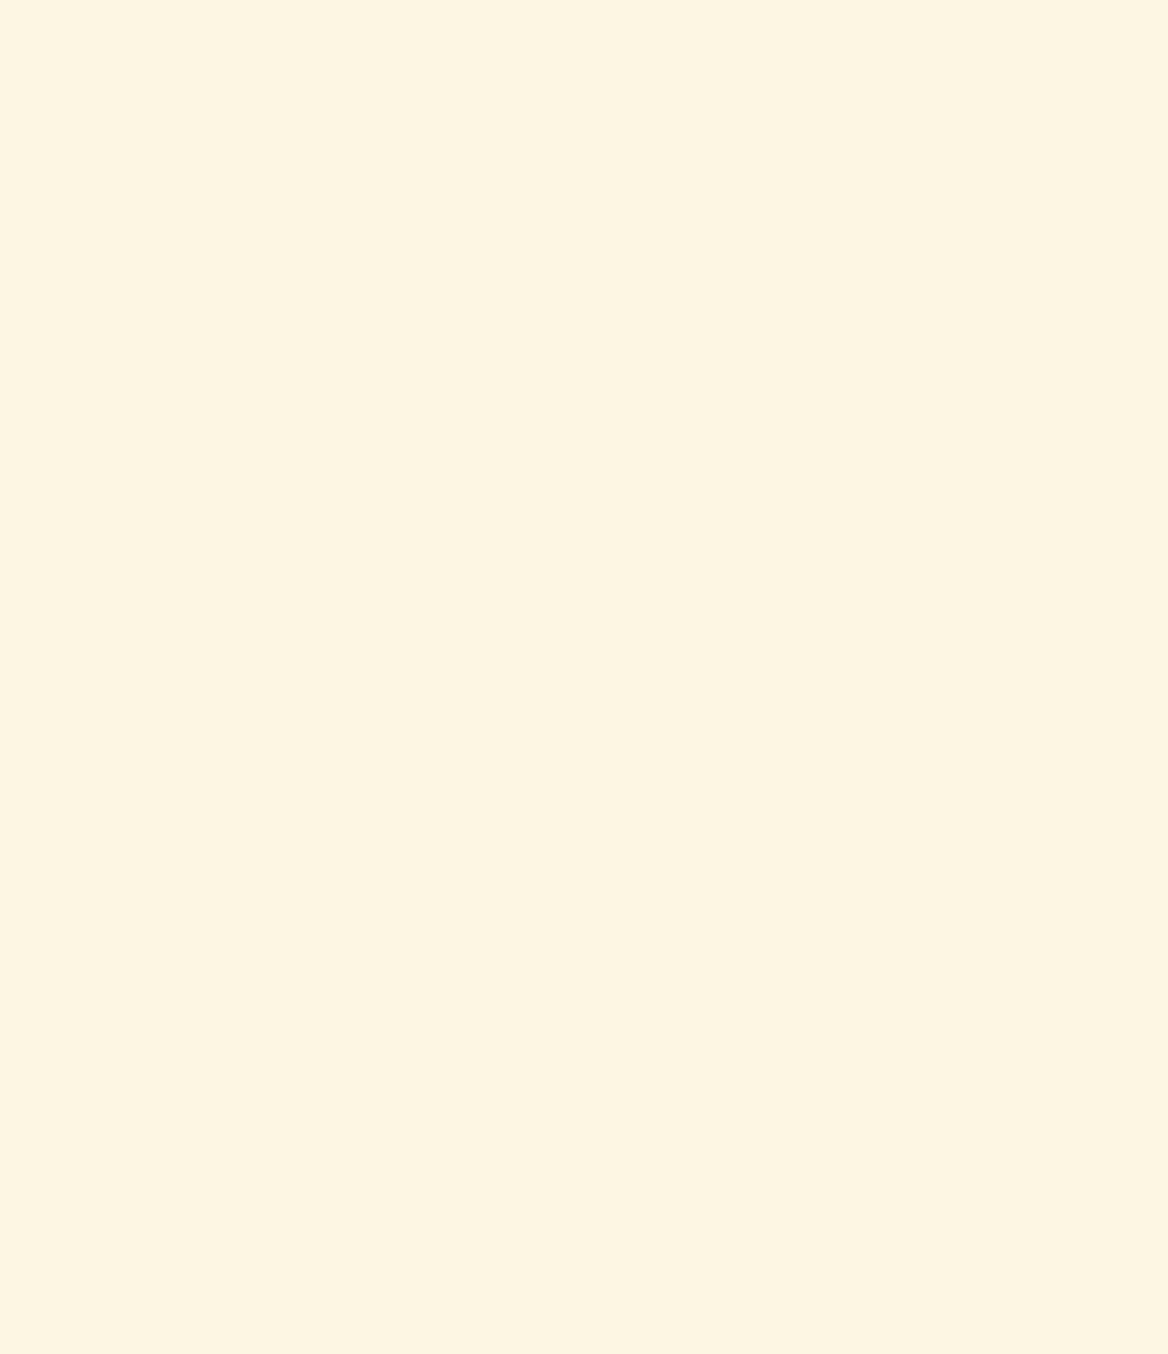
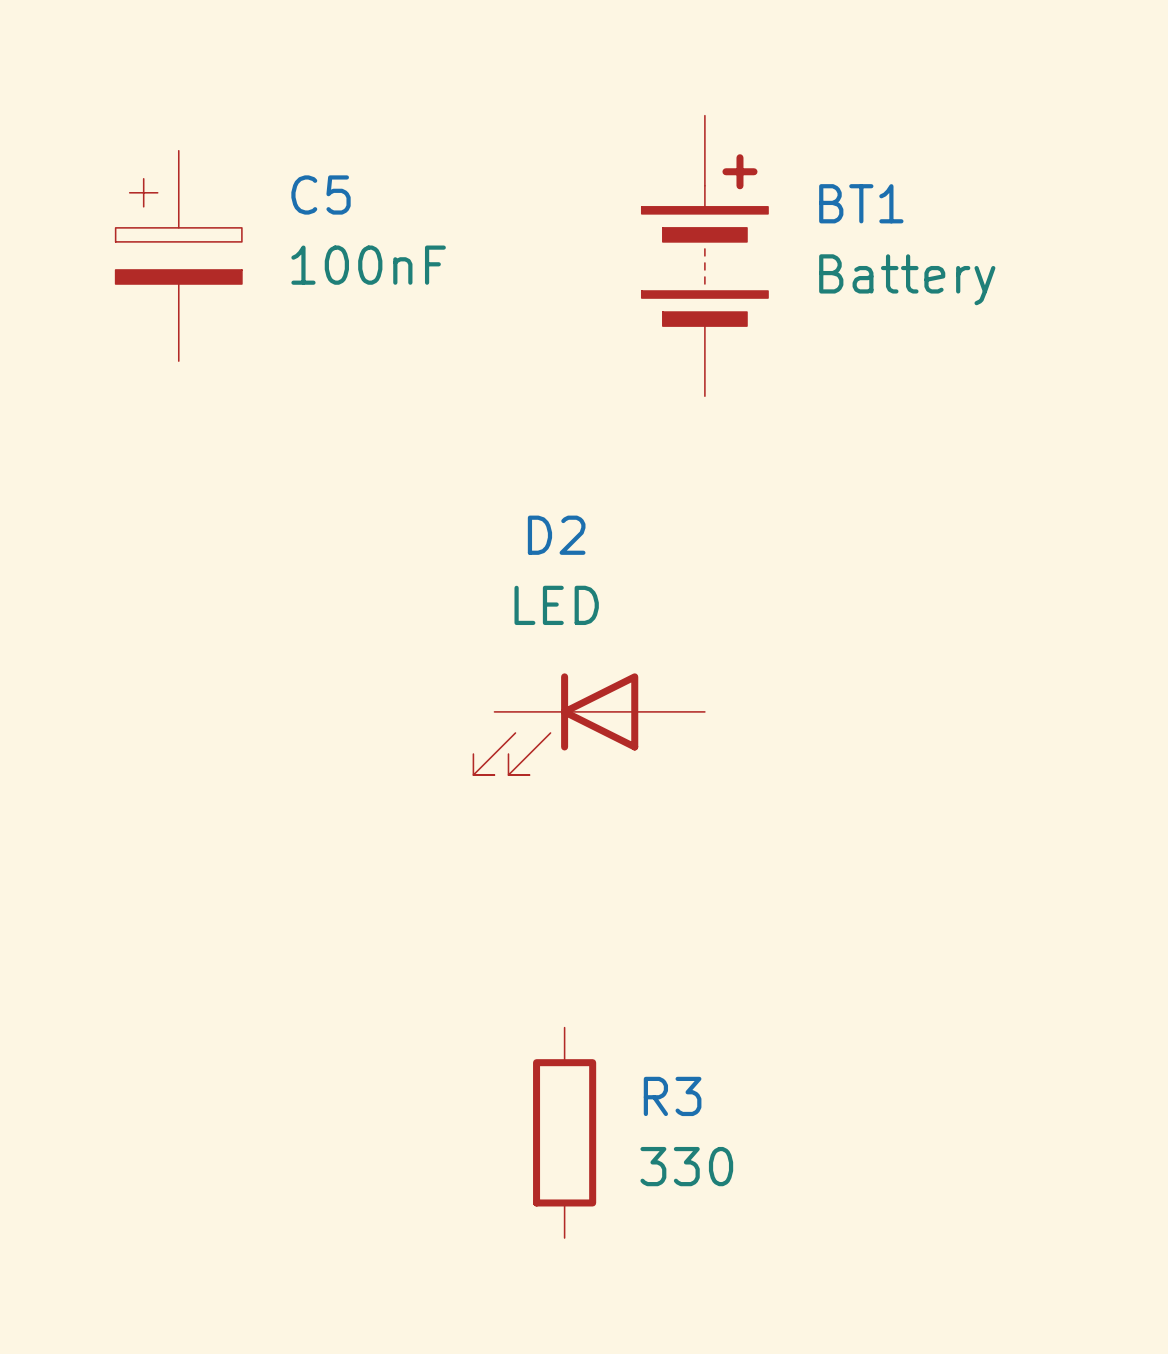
C5: none -> 100nF (178, 255)
BT1: none -> Battery (704, 255)
D2: none -> LED (589, 724)
R3: none -> 330 (564, 1132)

